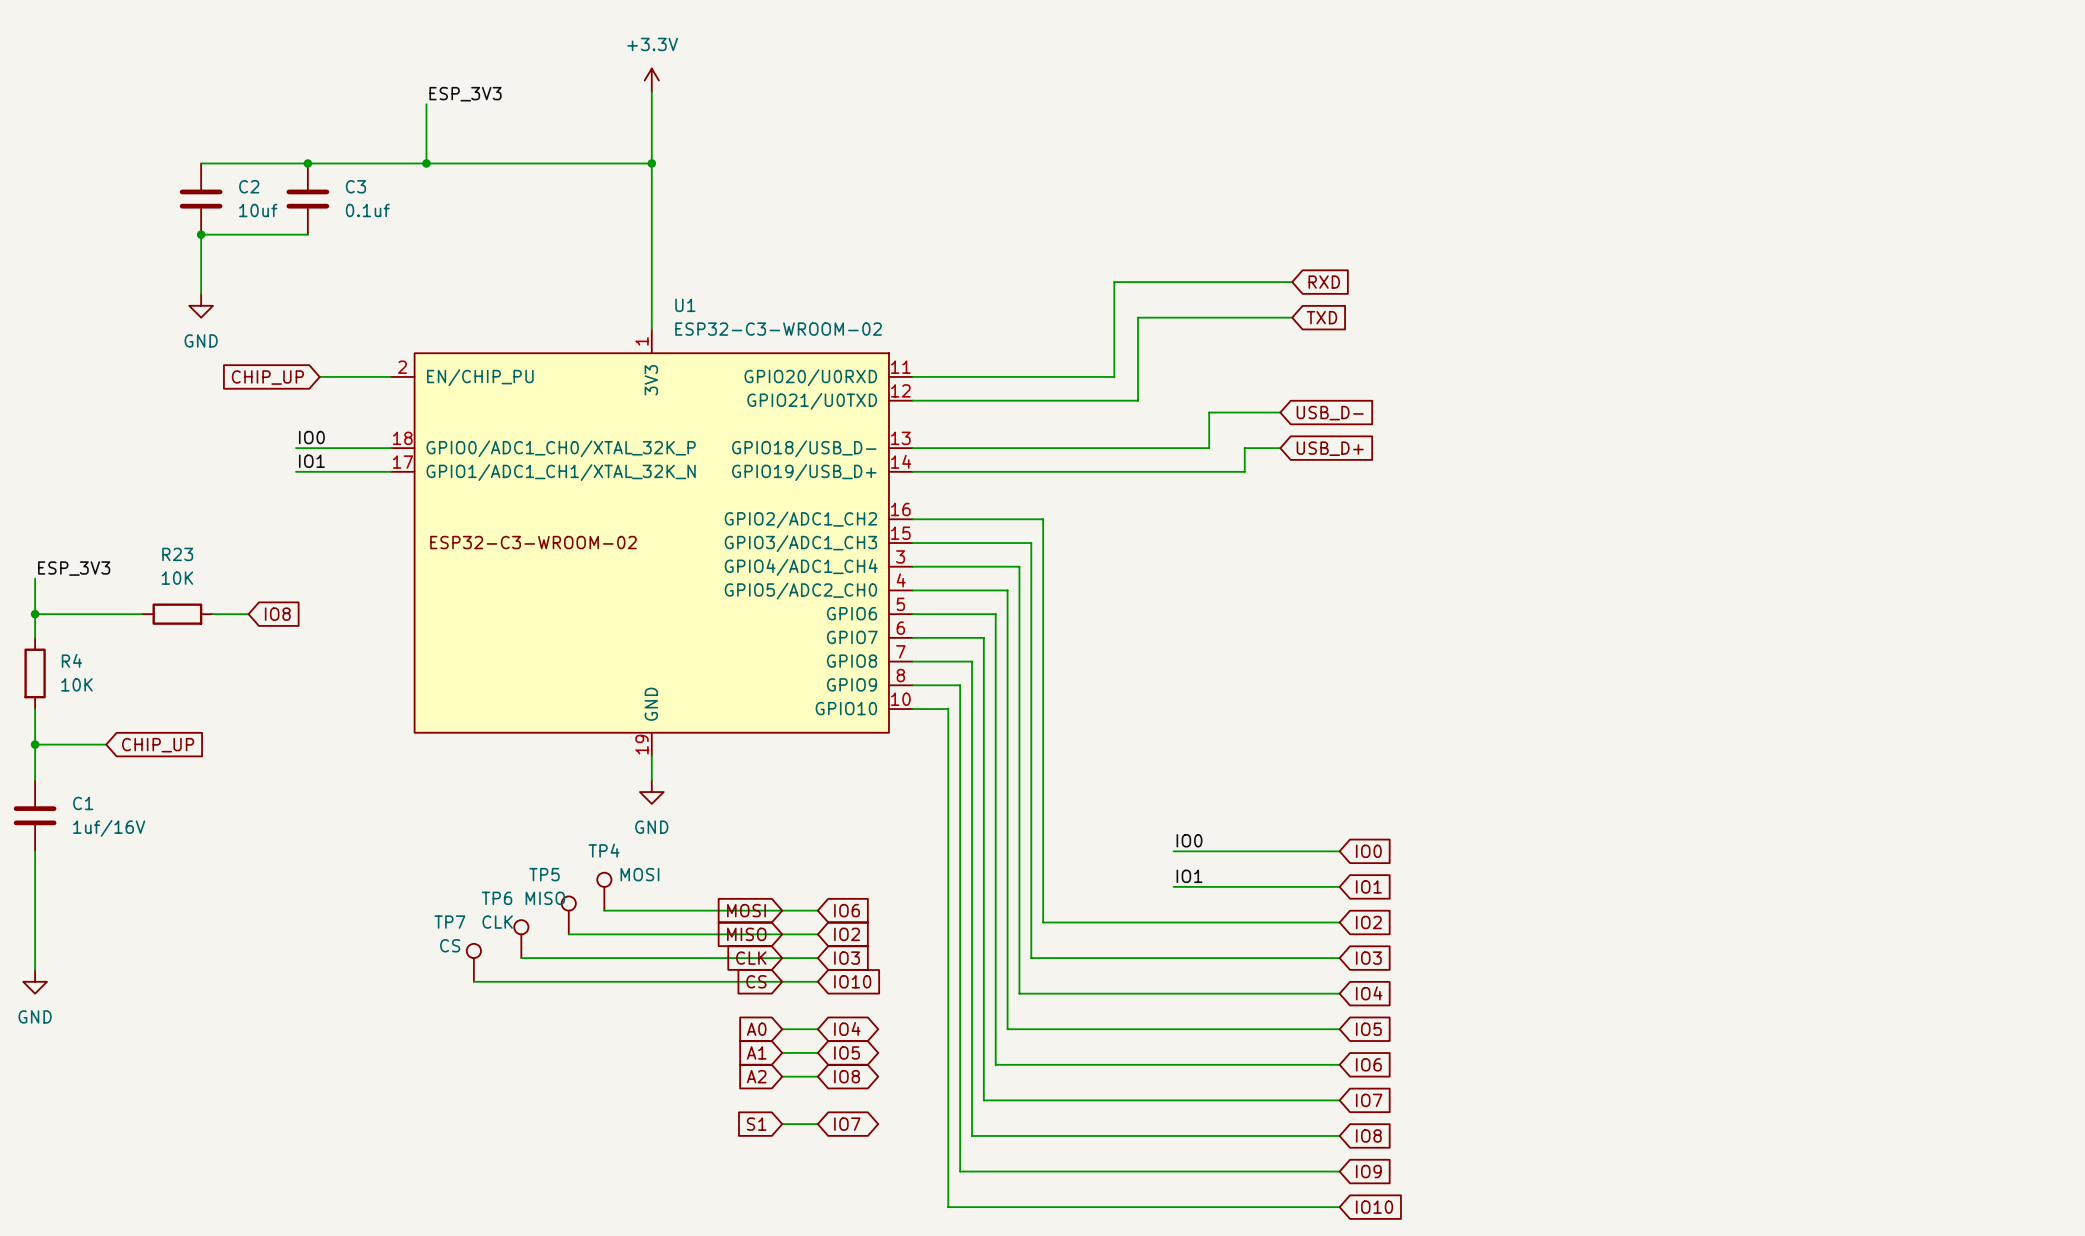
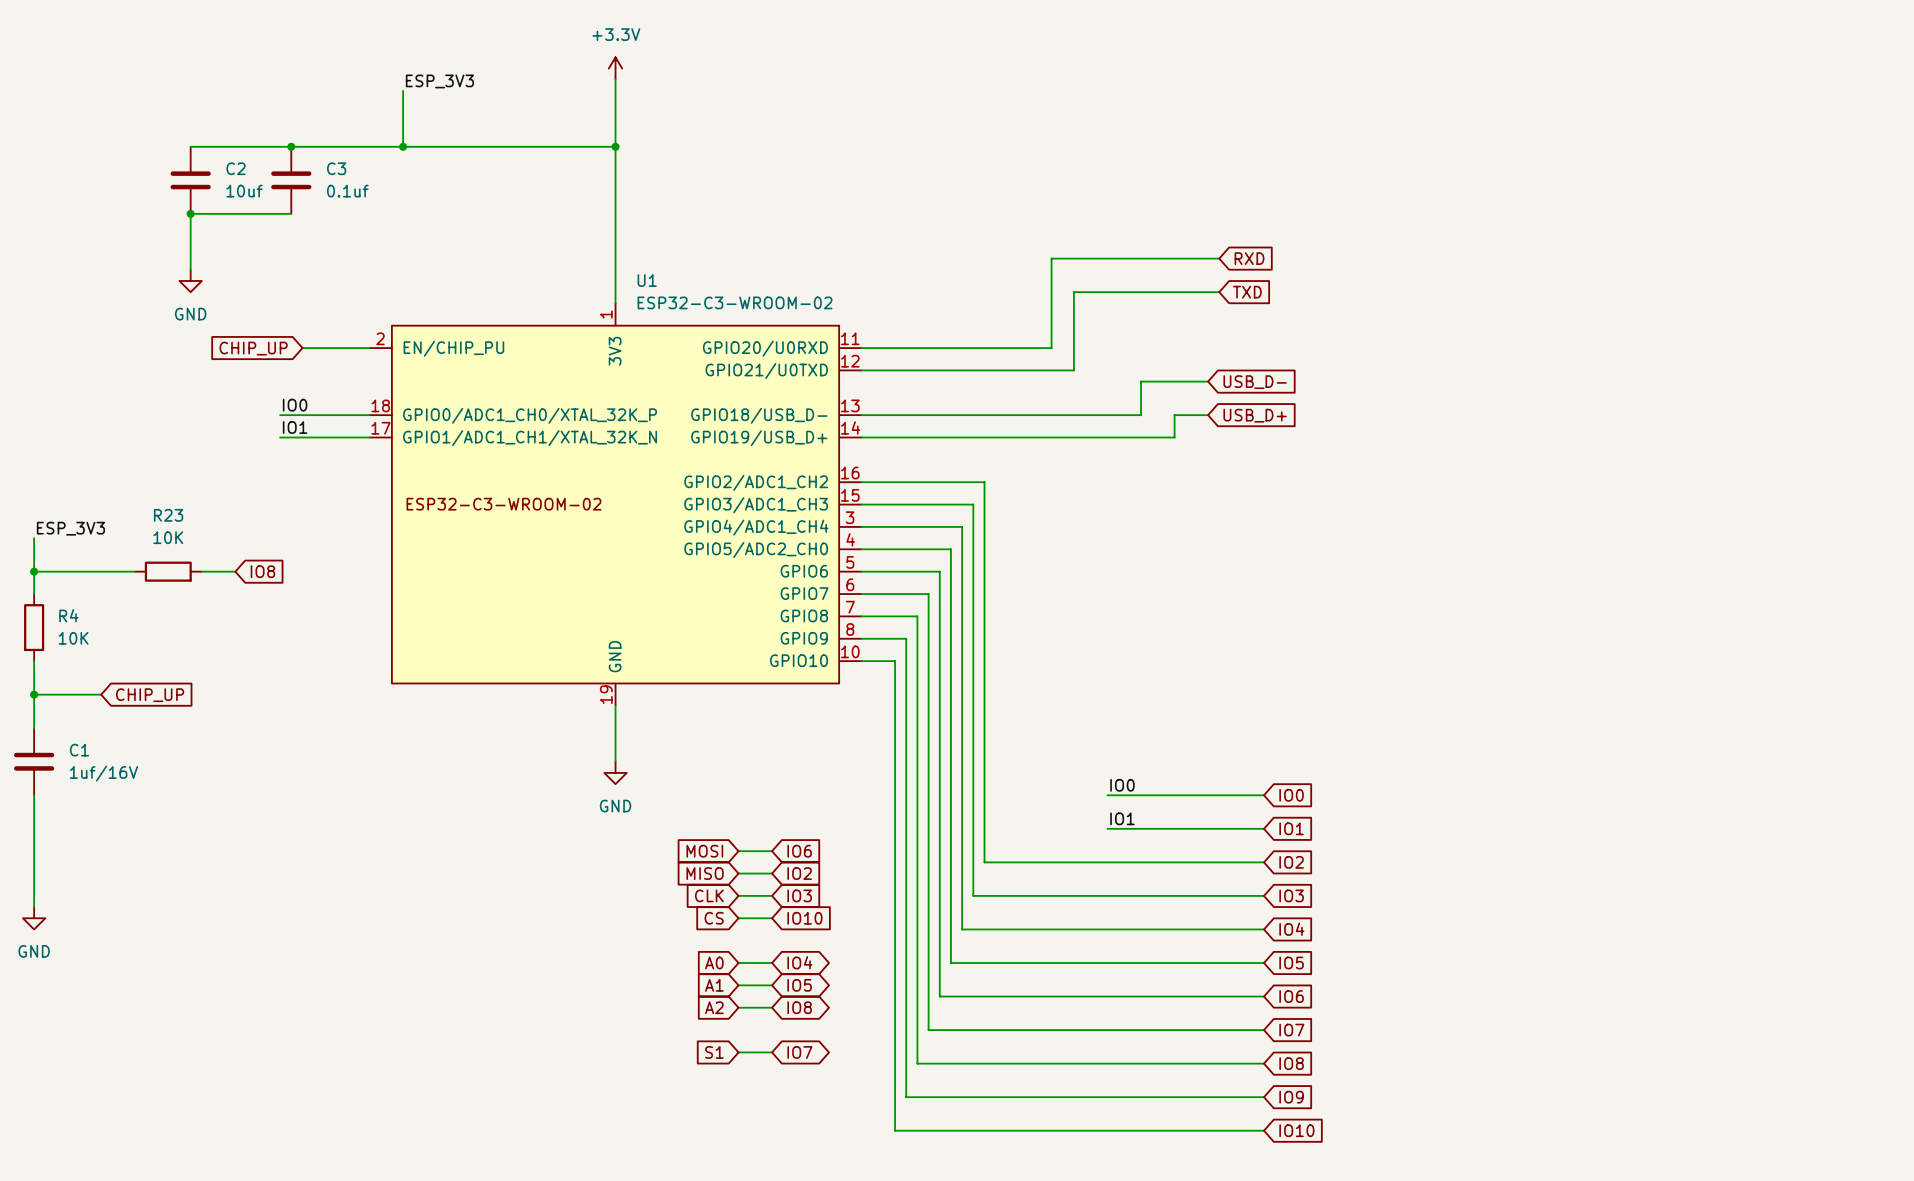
wire: none -> (615, 728) (615, 761)
power symbol position: GND (651, 792) -> GND (615, 772)
TP4: MOSI (604, 891) -> none
wire: (604, 910) (782, 910) -> none
TP5: MISO (568, 915) -> none
wire: (568, 934) (782, 934) -> none
TP6: CLK (521, 939) -> none
wire: (521, 958) (782, 958) -> none
TP7: CS (473, 962) -> none
wire: (473, 981) (782, 981) -> none

